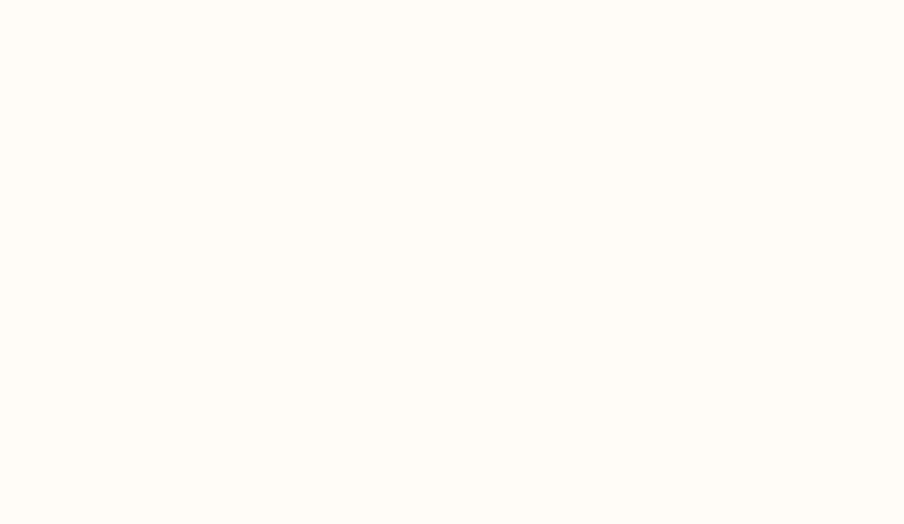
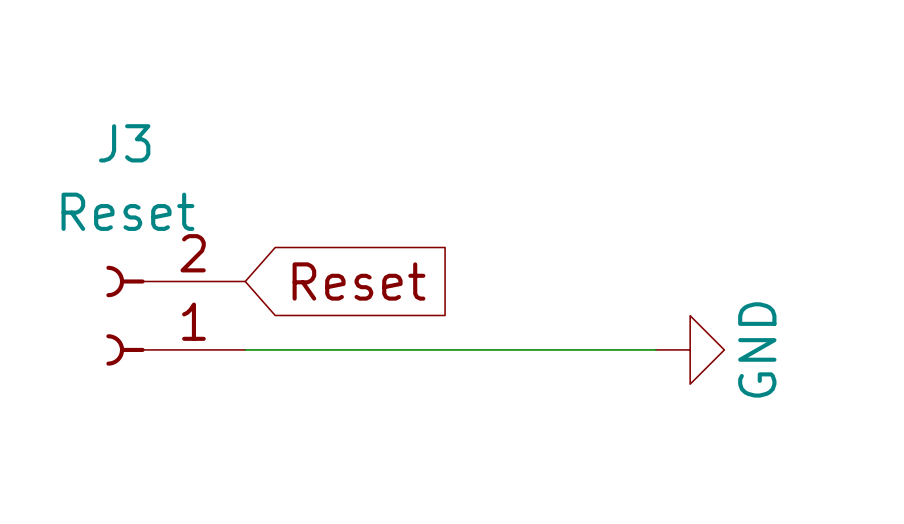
global label: none -> Reset (358, 281)
J3: none -> Reset (175, 315)
wire: none -> (245, 349) (655, 349)
power symbol: none -> GND (690, 349)

